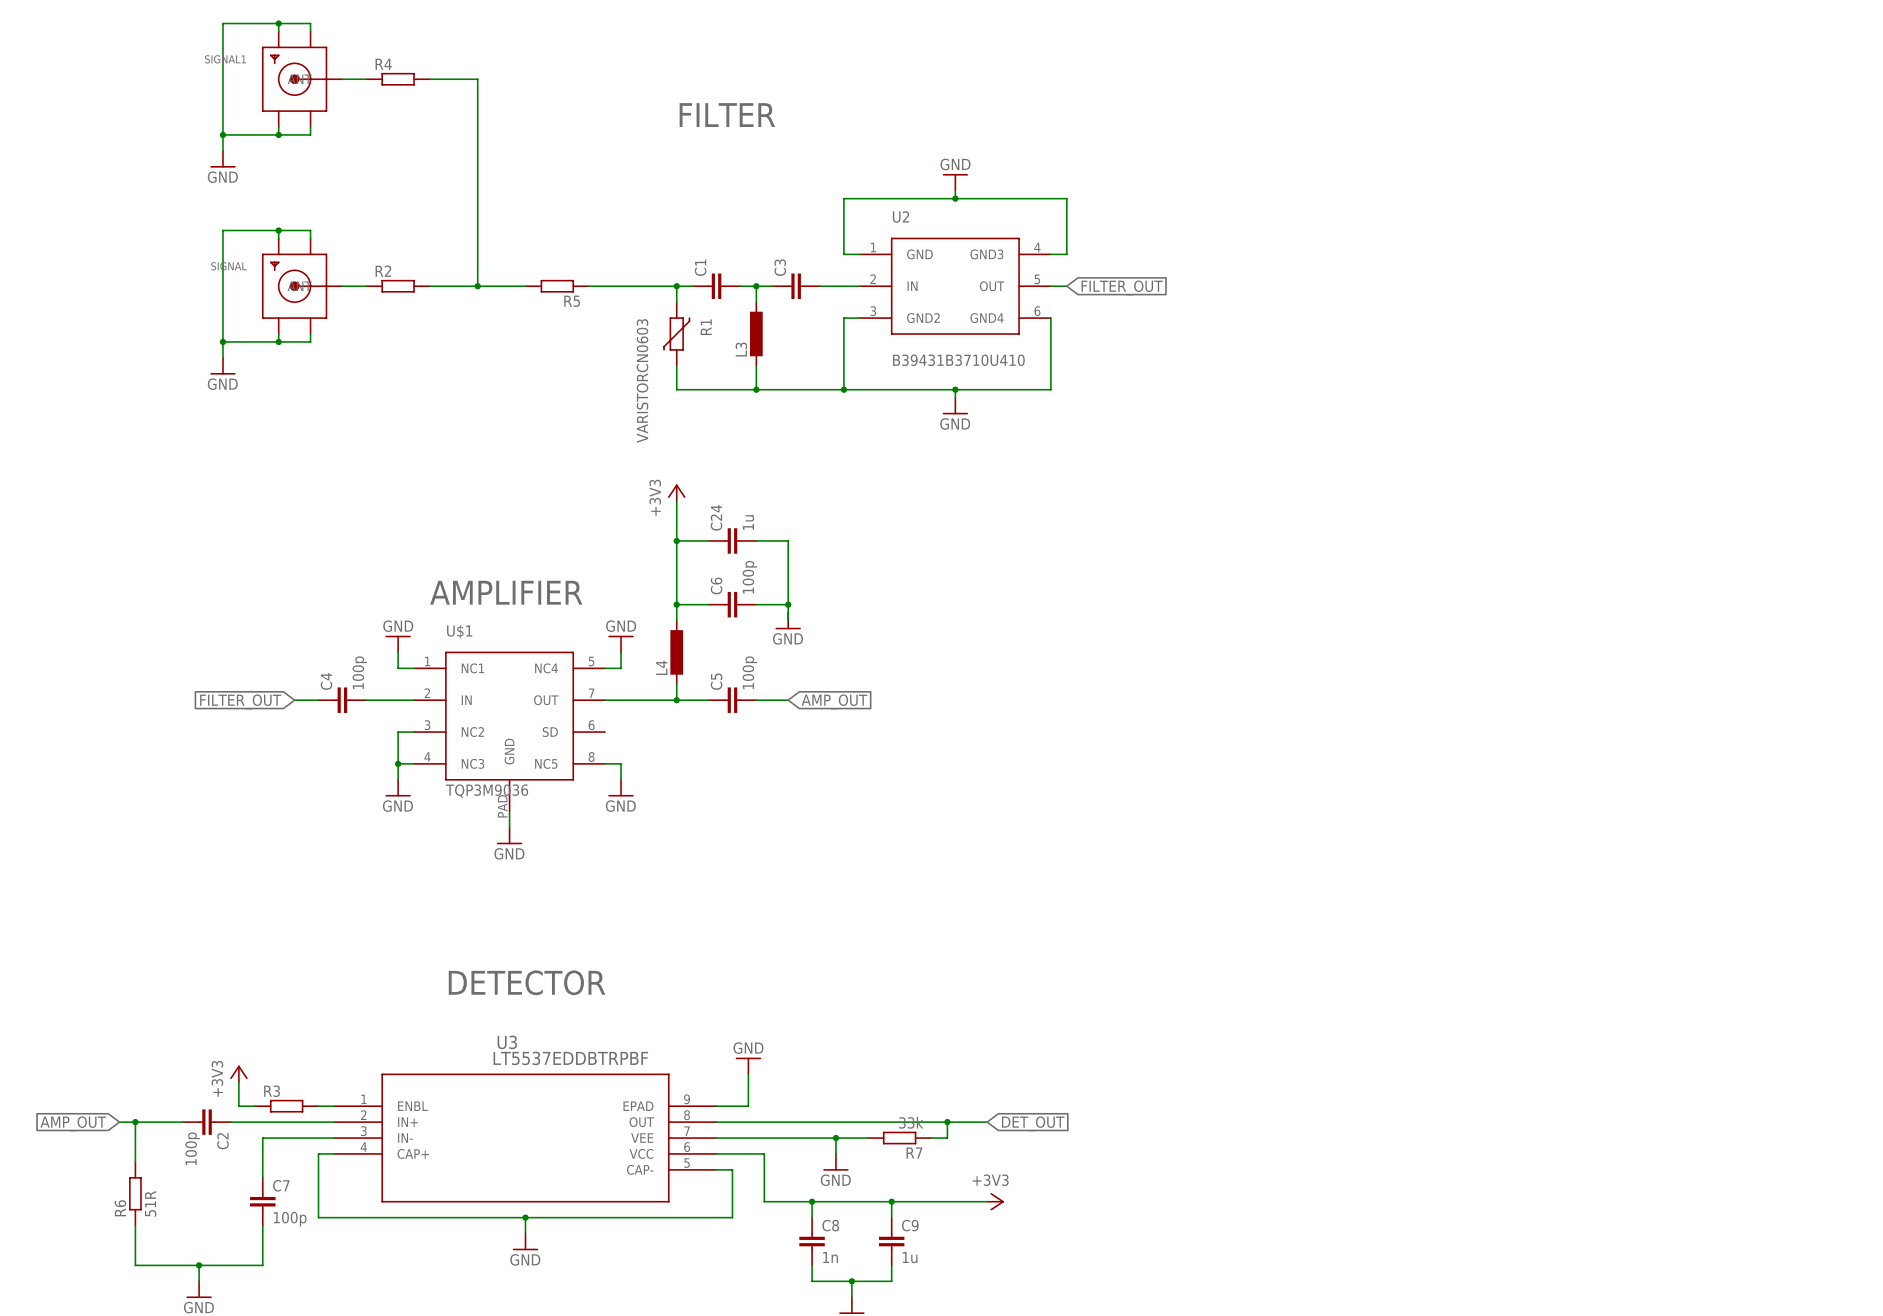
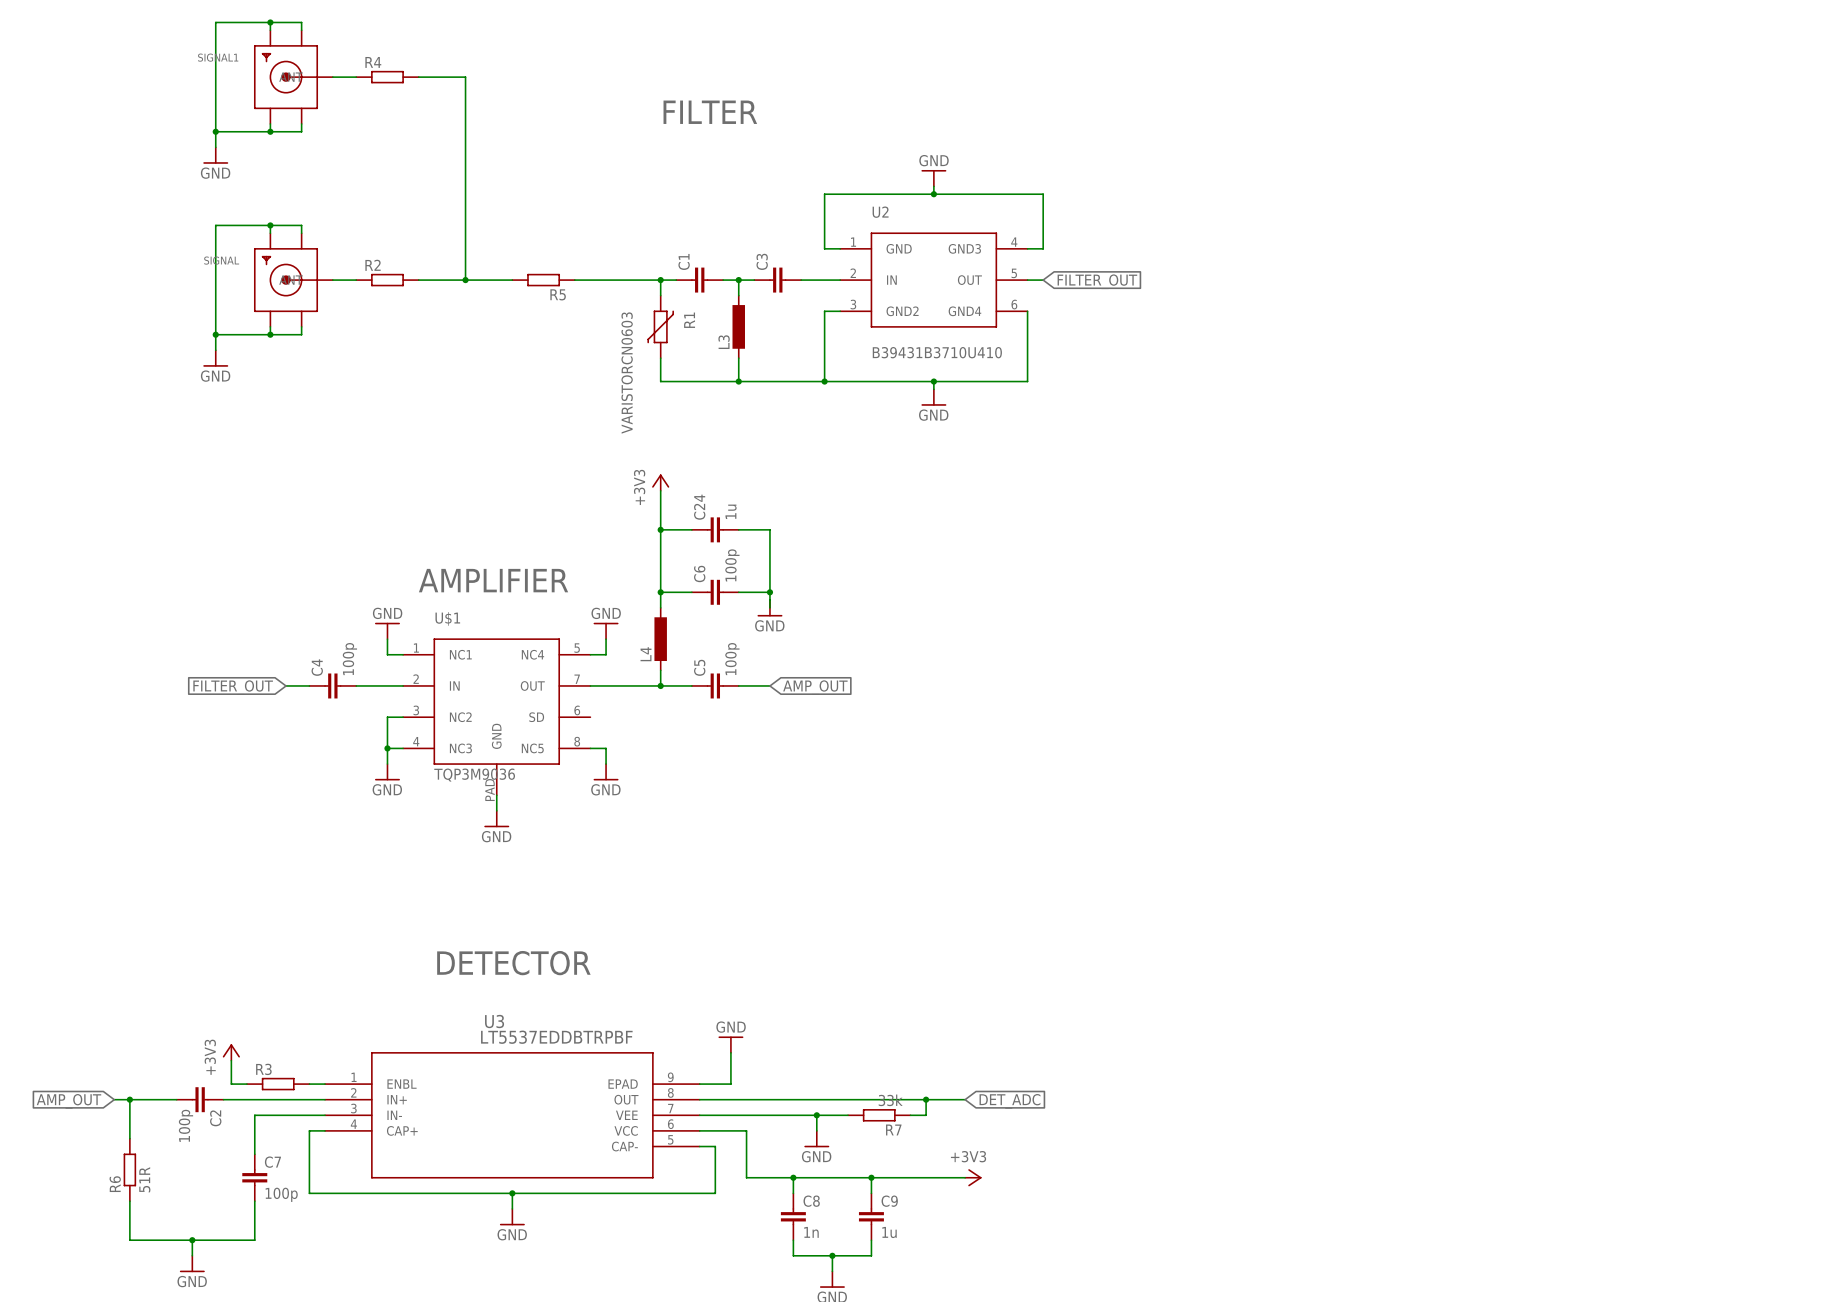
global label: DET_OUT (1033, 1123) -> DET_ADC (1009, 1101)

